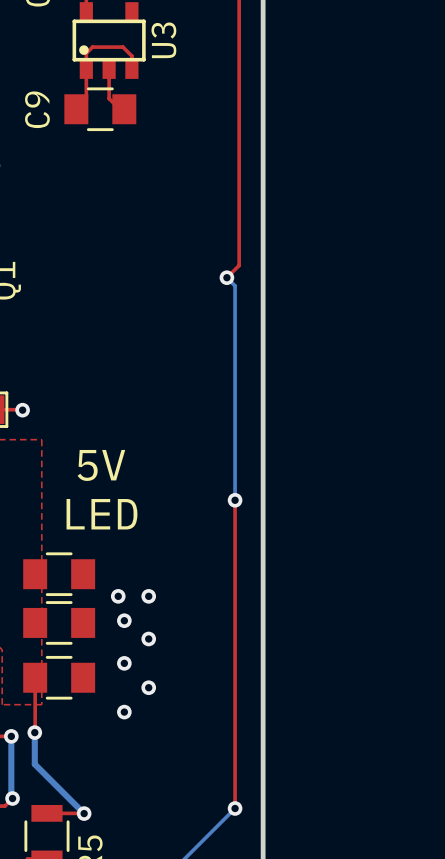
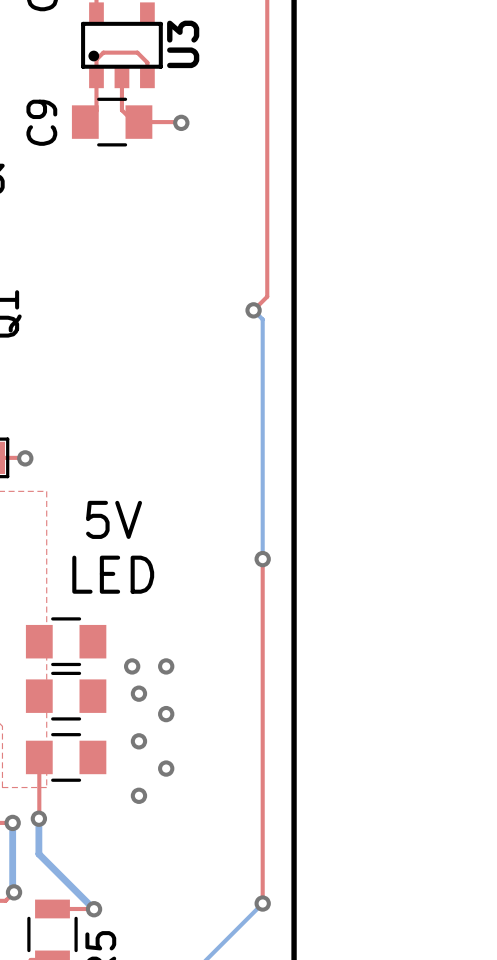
top track: none -> (138, 122) (181, 122)
via: none -> (181, 122)

